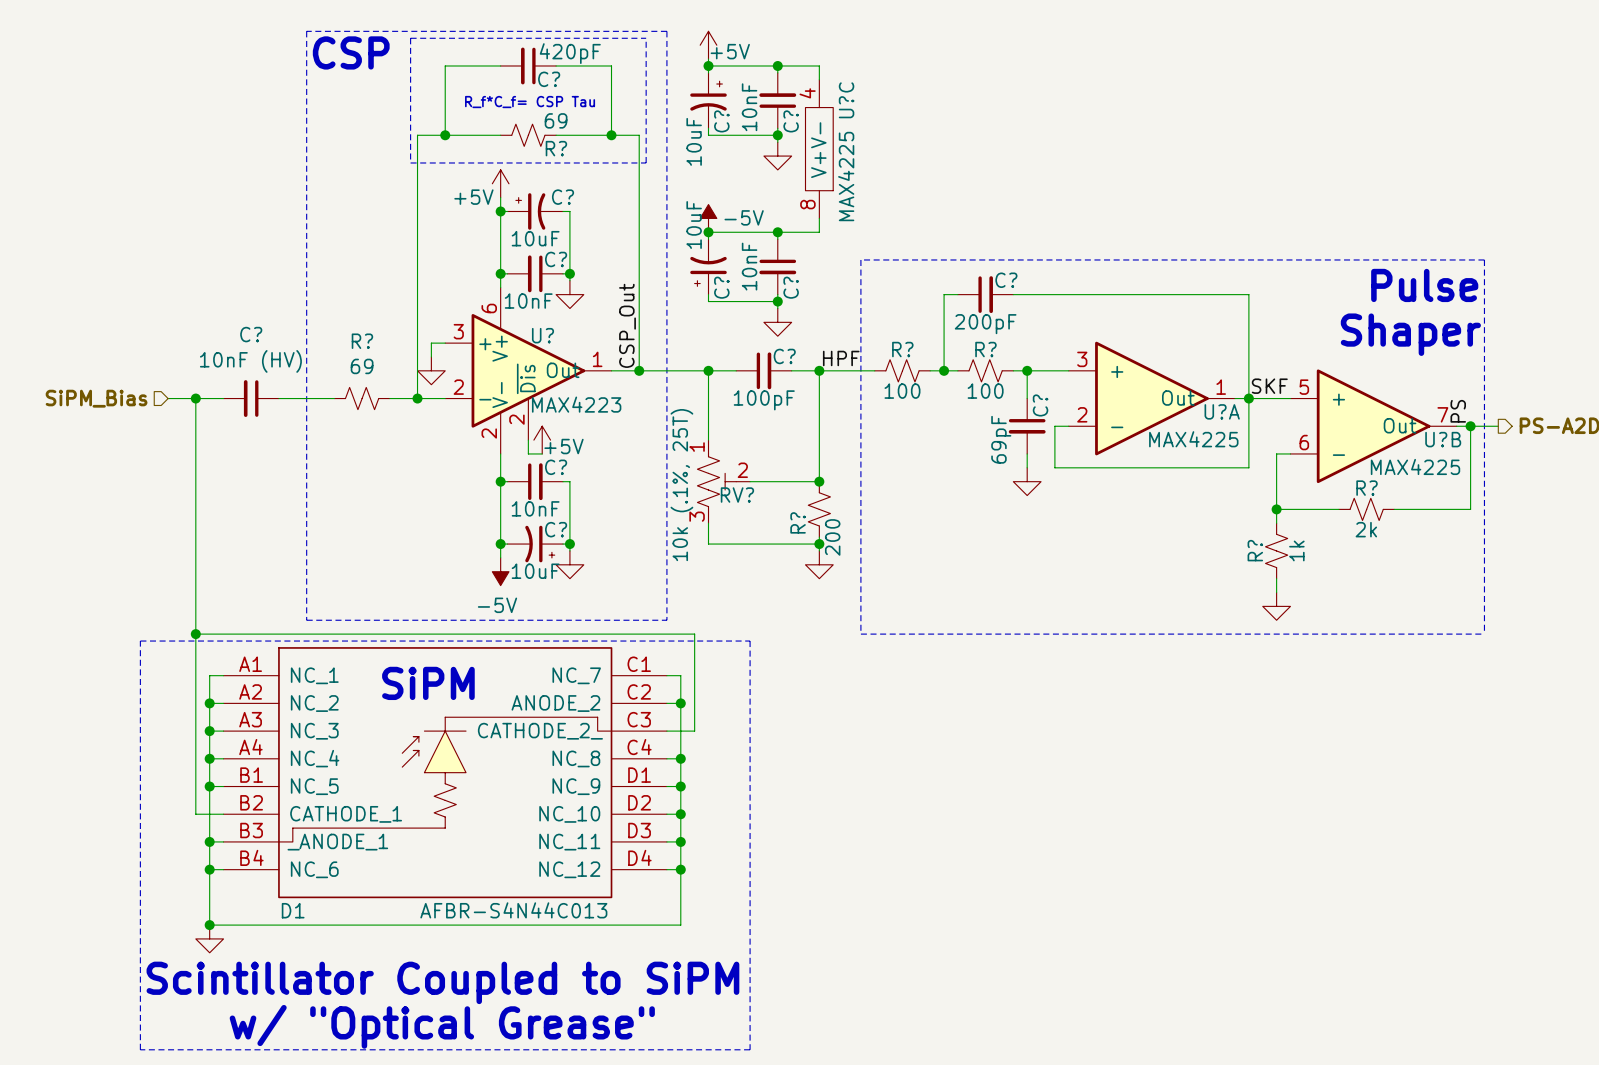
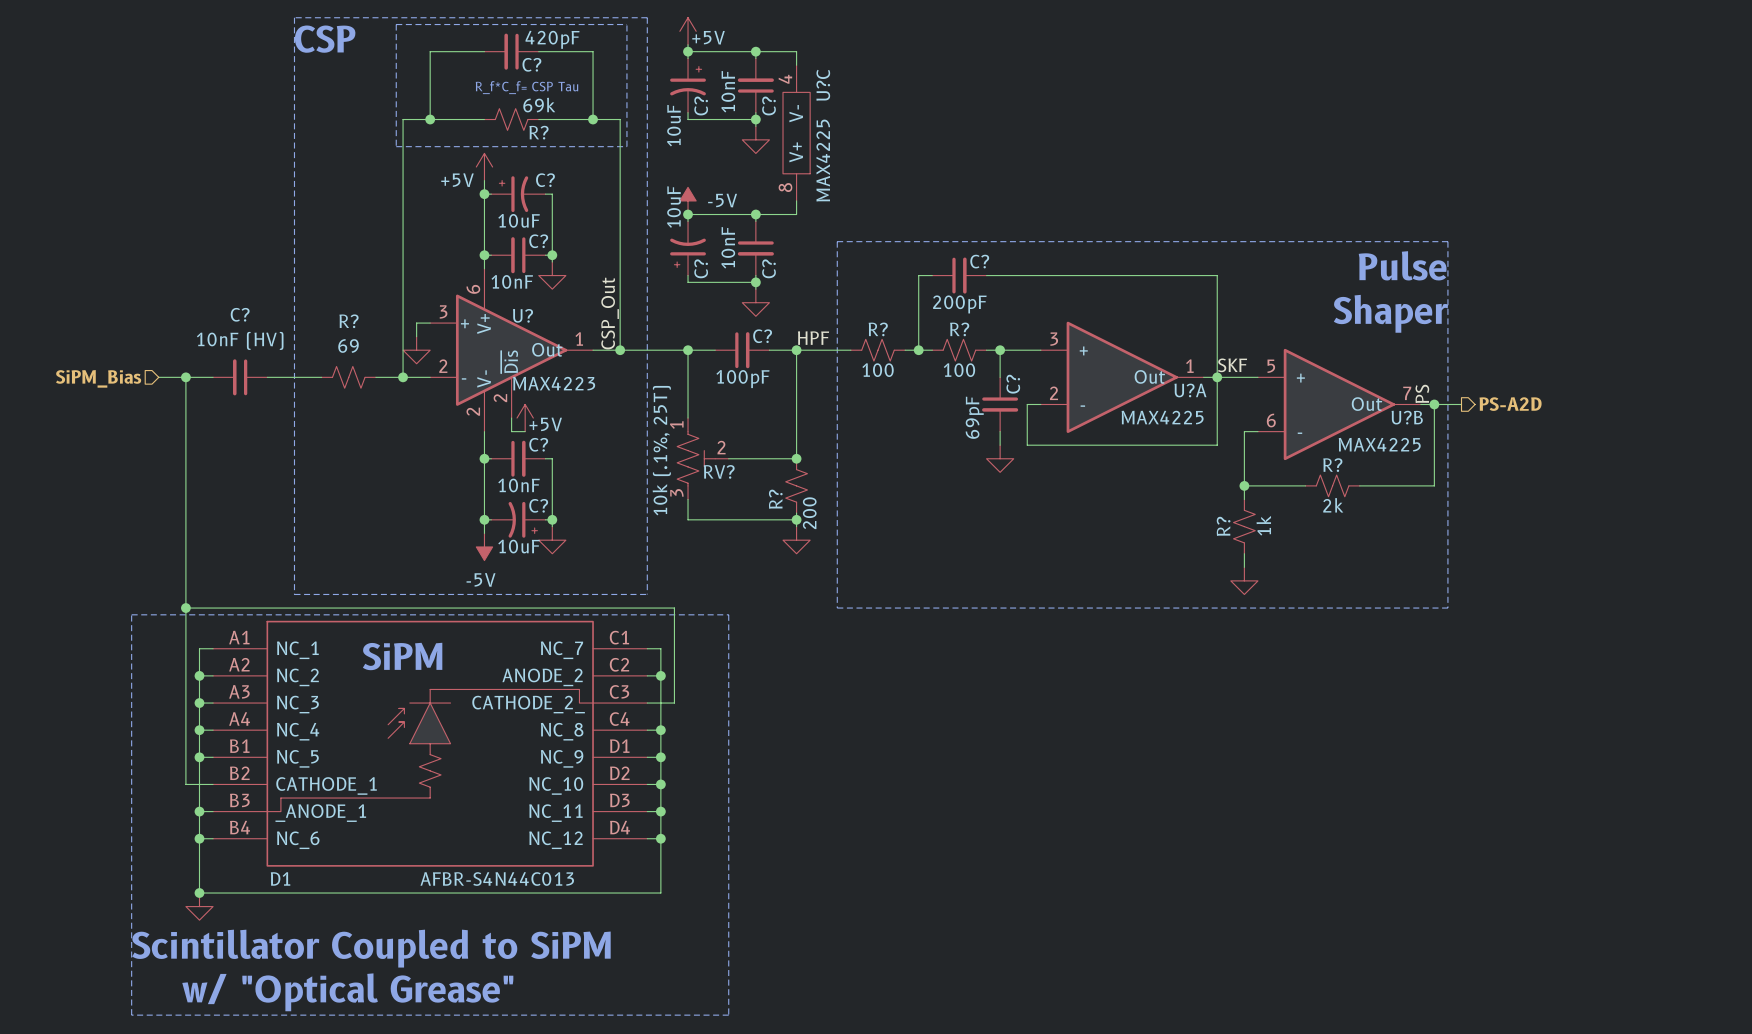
R? value: 69 (556, 120) -> 69k (539, 105)

